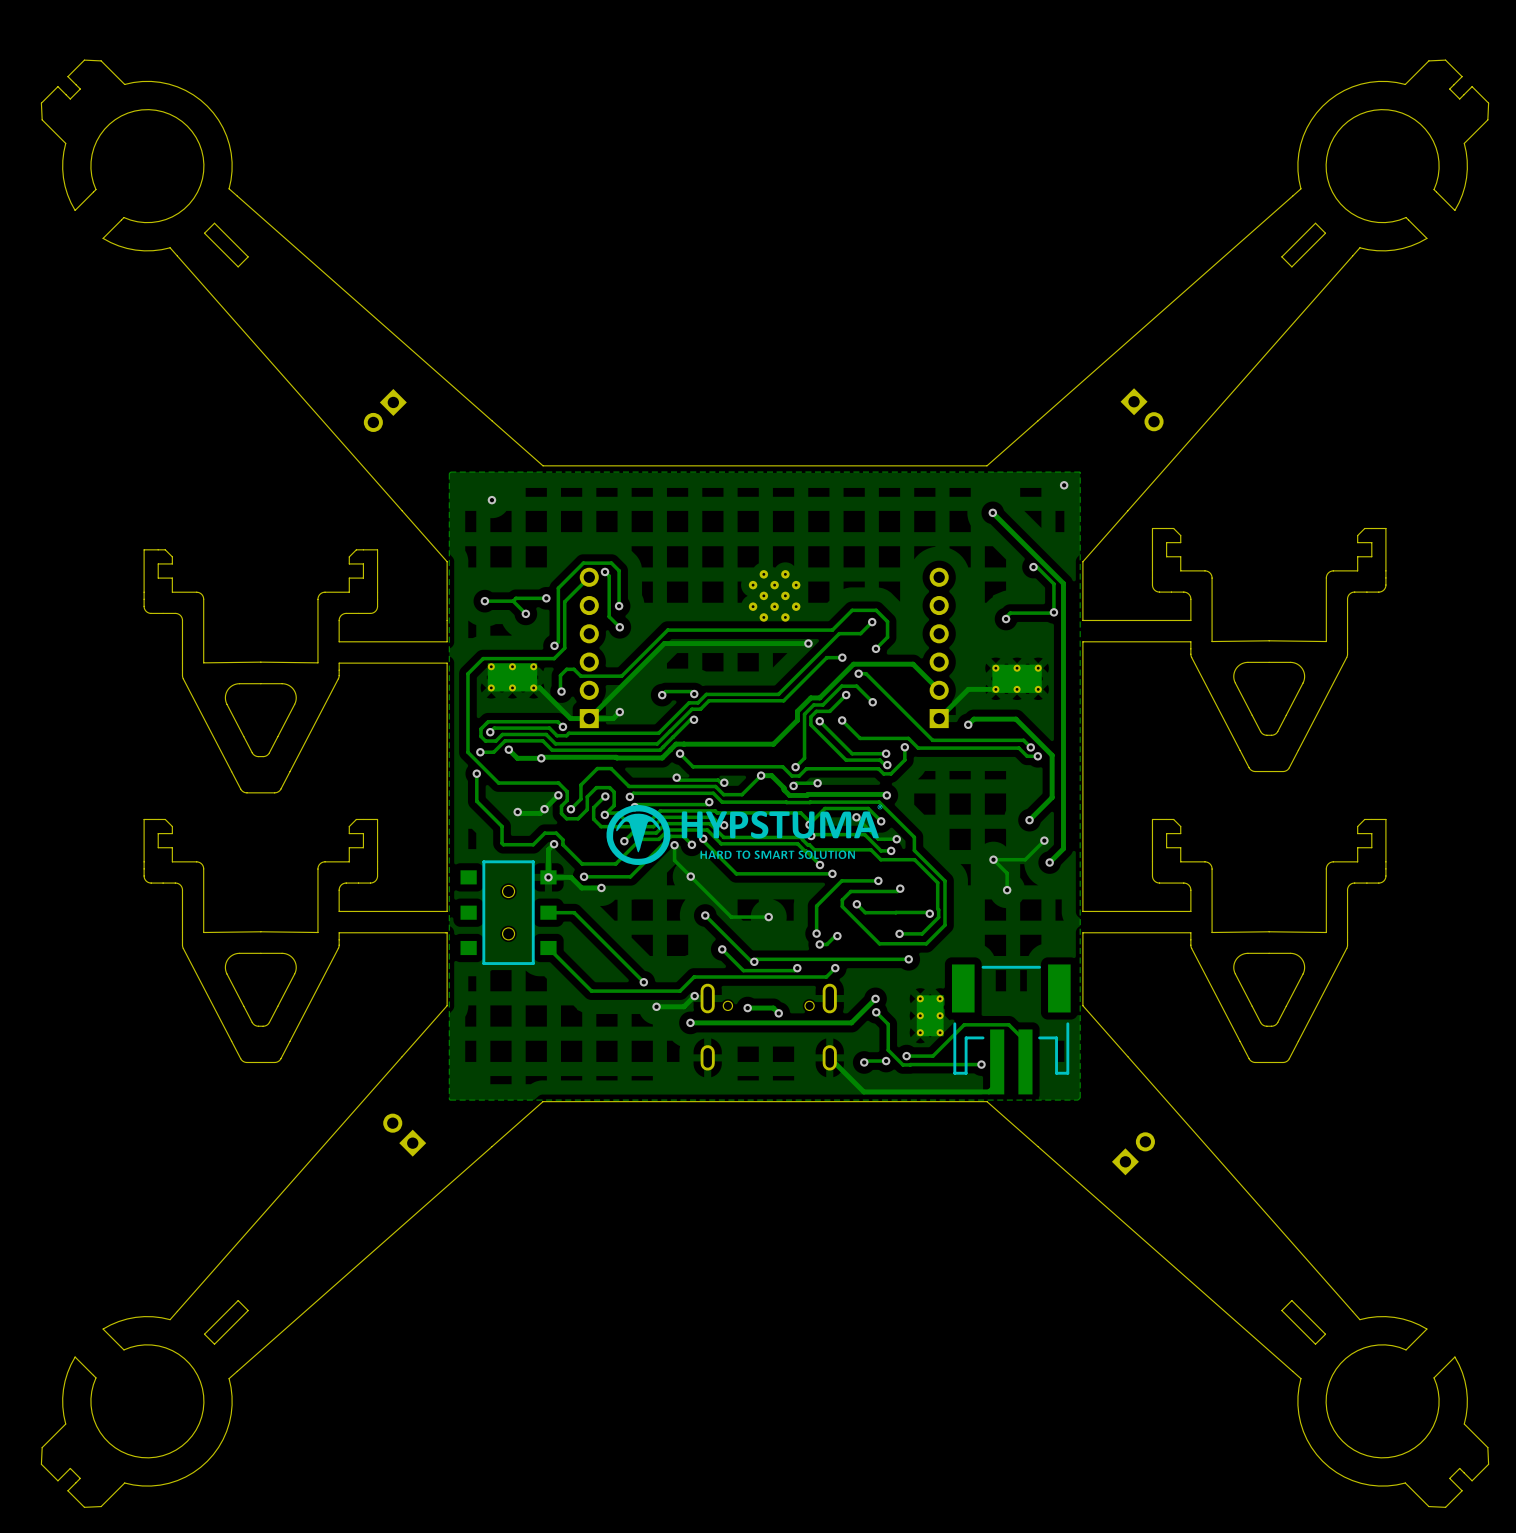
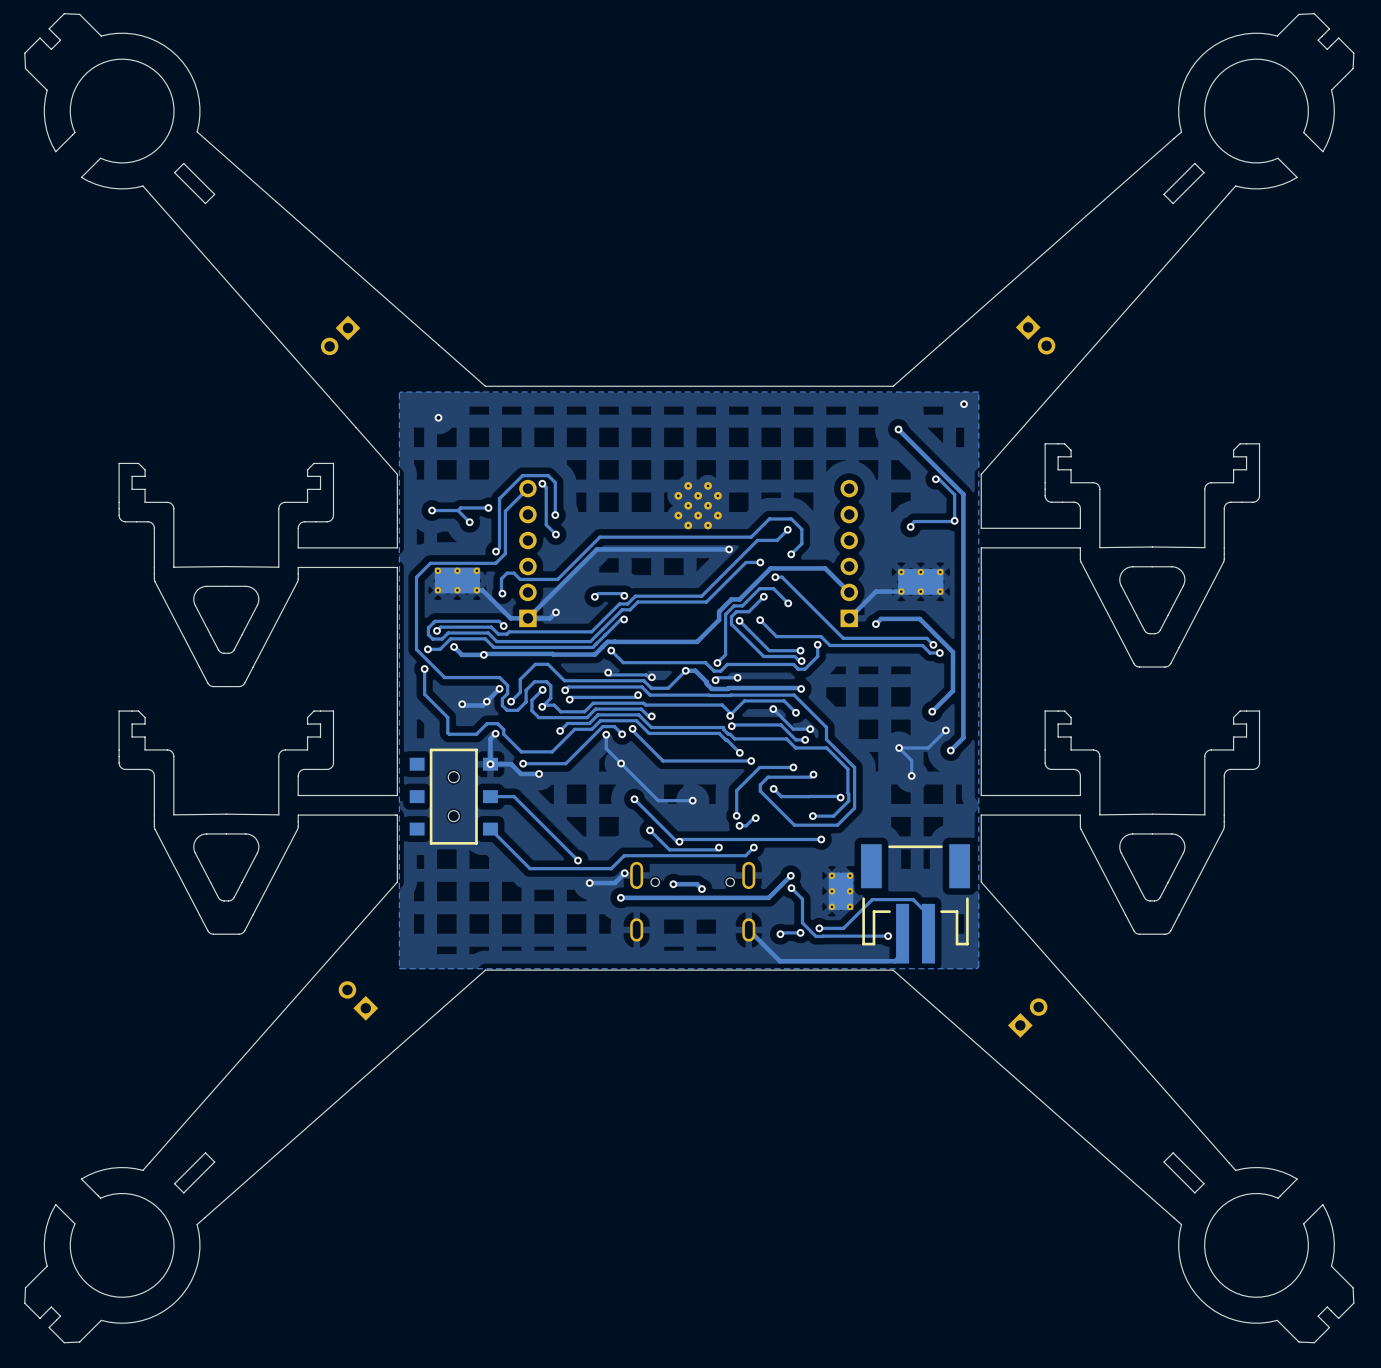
drawing: [606, 804, 883, 866] -> none

